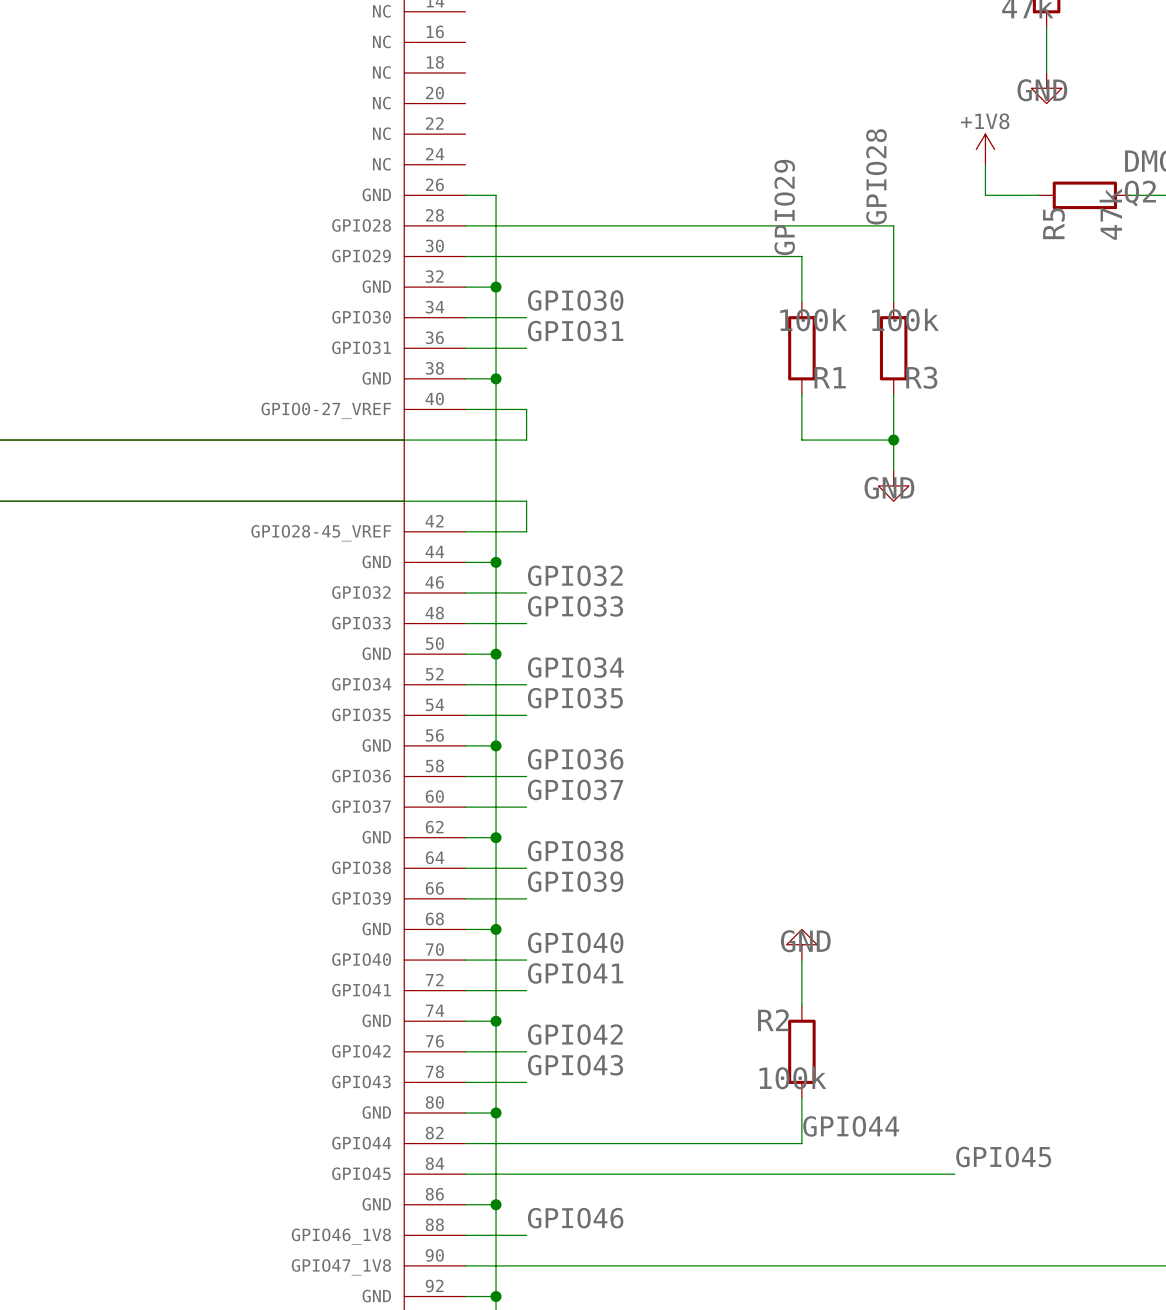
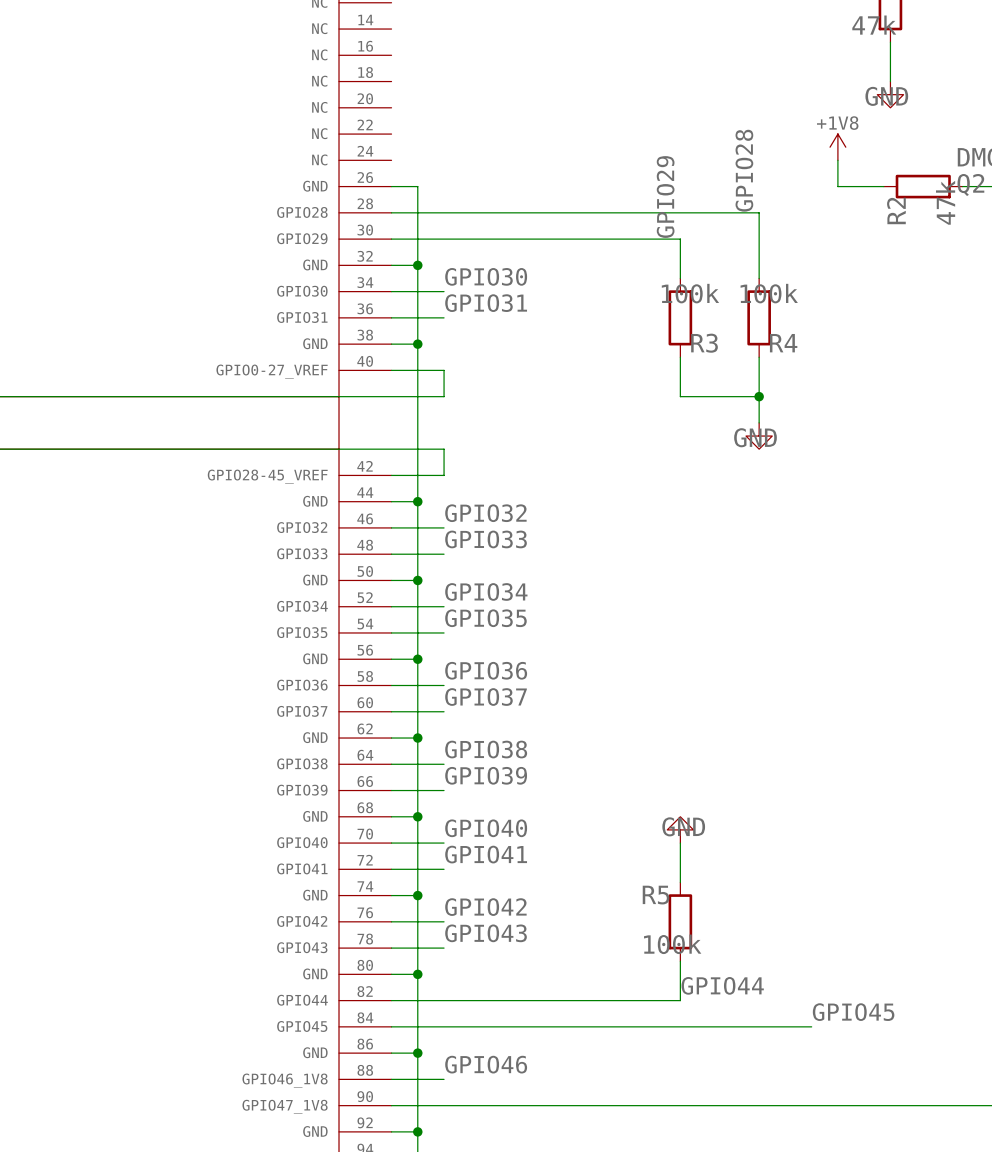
R5 name: R5 (1053, 223) -> R2 (896, 210)
R1 name: R1 (830, 377) -> R3 (704, 343)
R3 name: R3 (921, 377) -> R4 (783, 343)
R2 name: R2 (773, 1020) -> R5 (656, 895)

